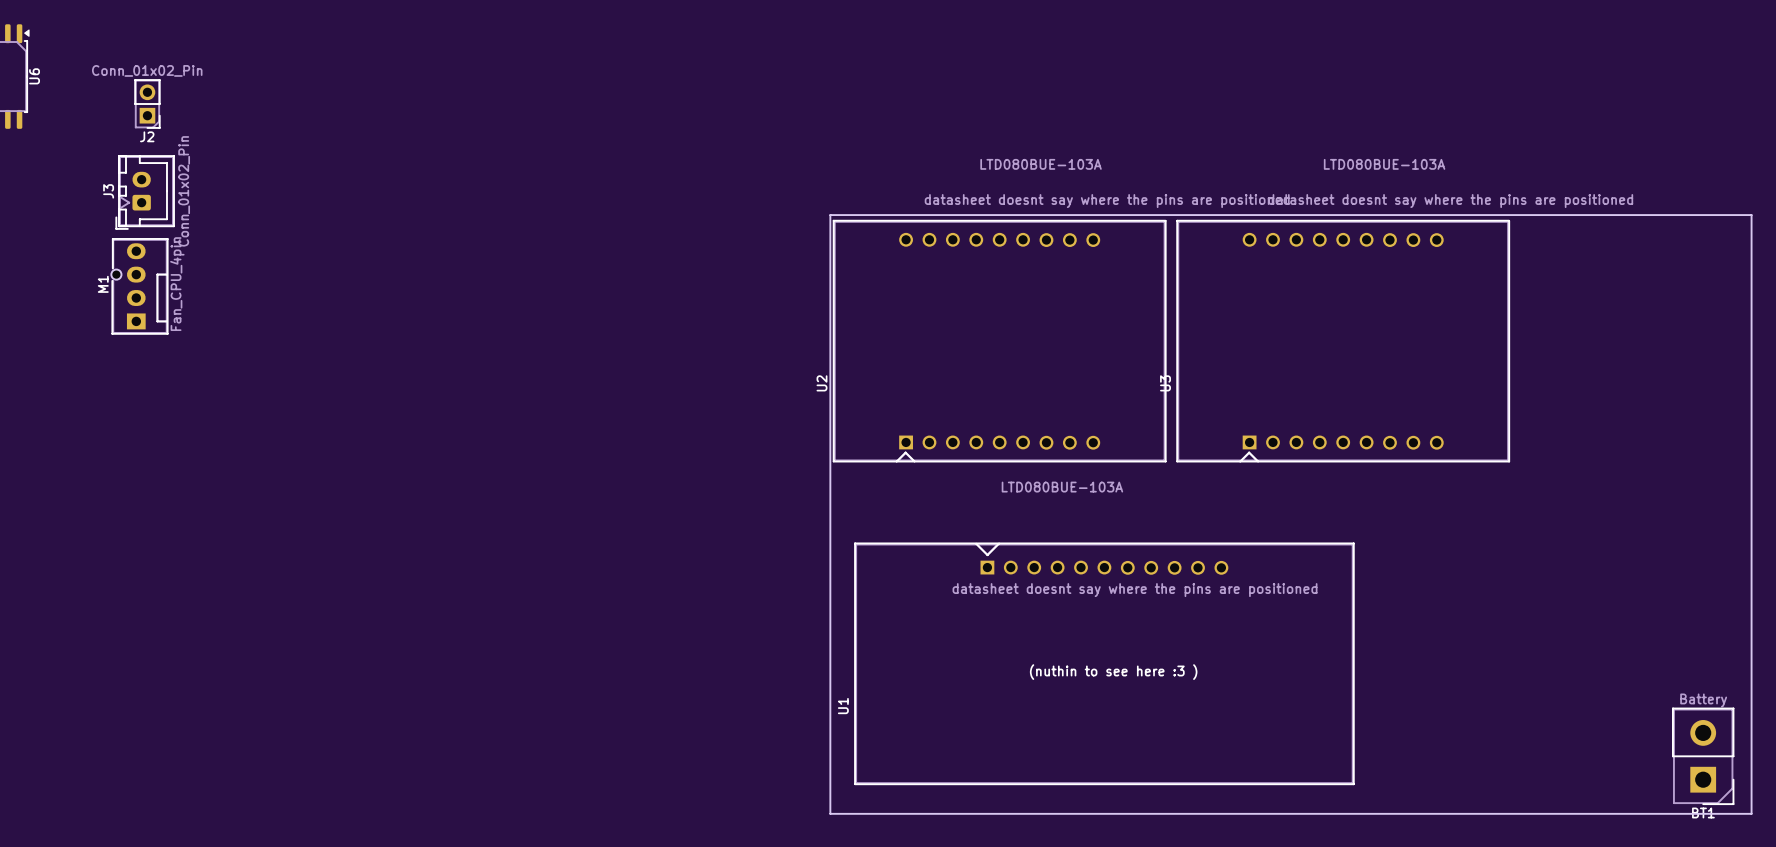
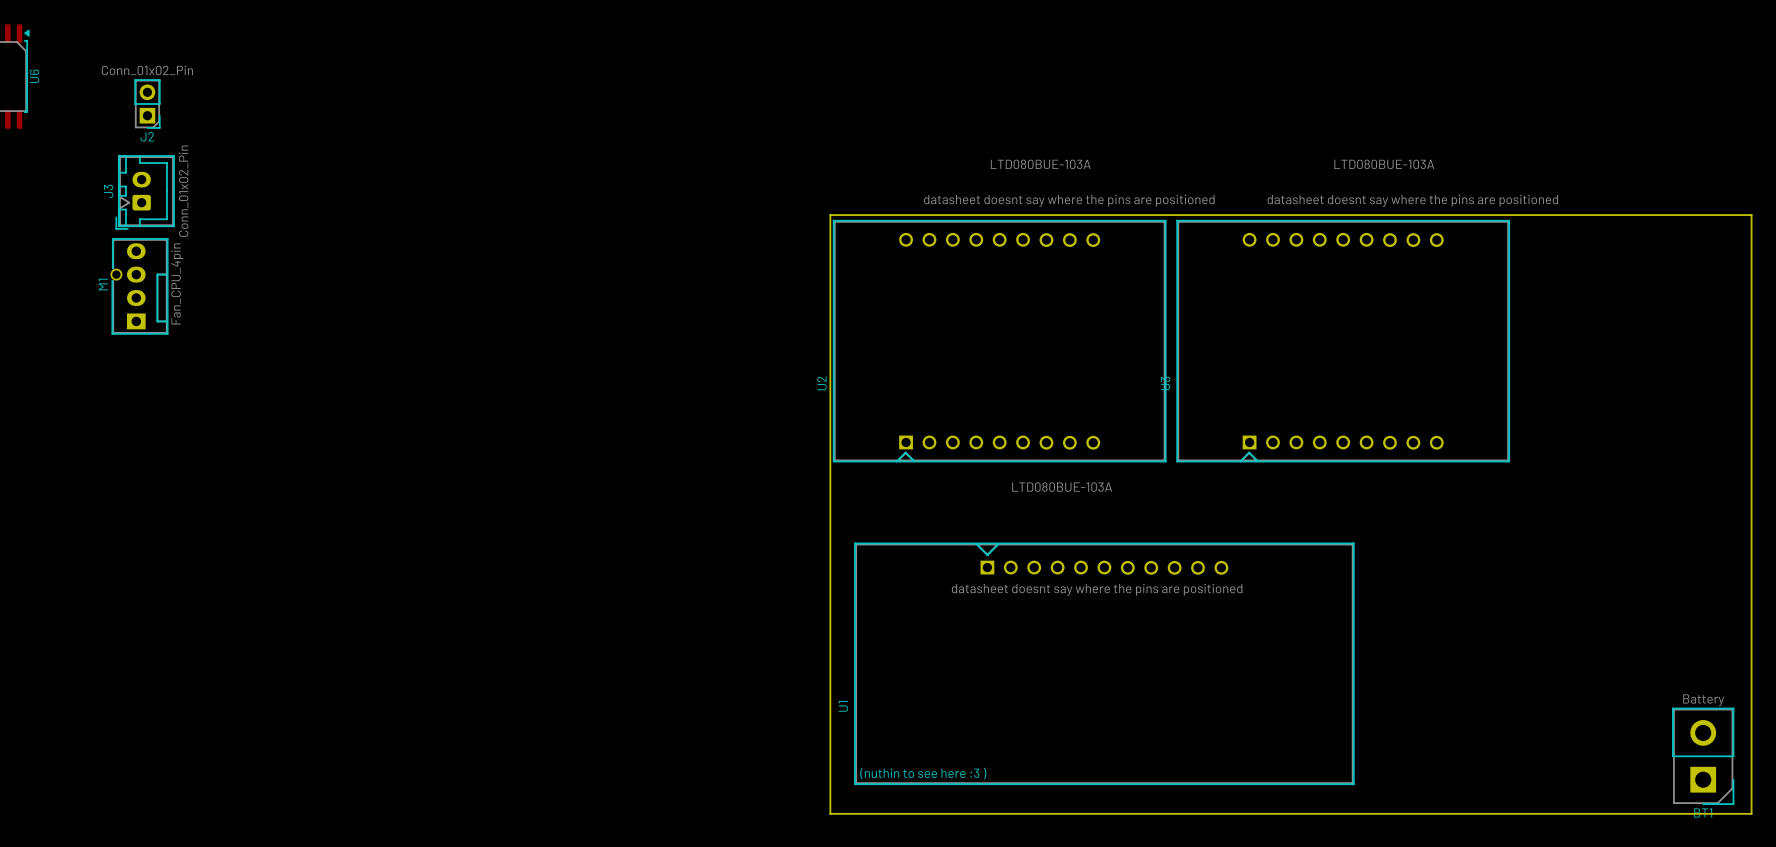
U1 text position: (nuthin to see here :3 ) (1113, 672) -> (nuthin to see here :3 ) (923, 773)

